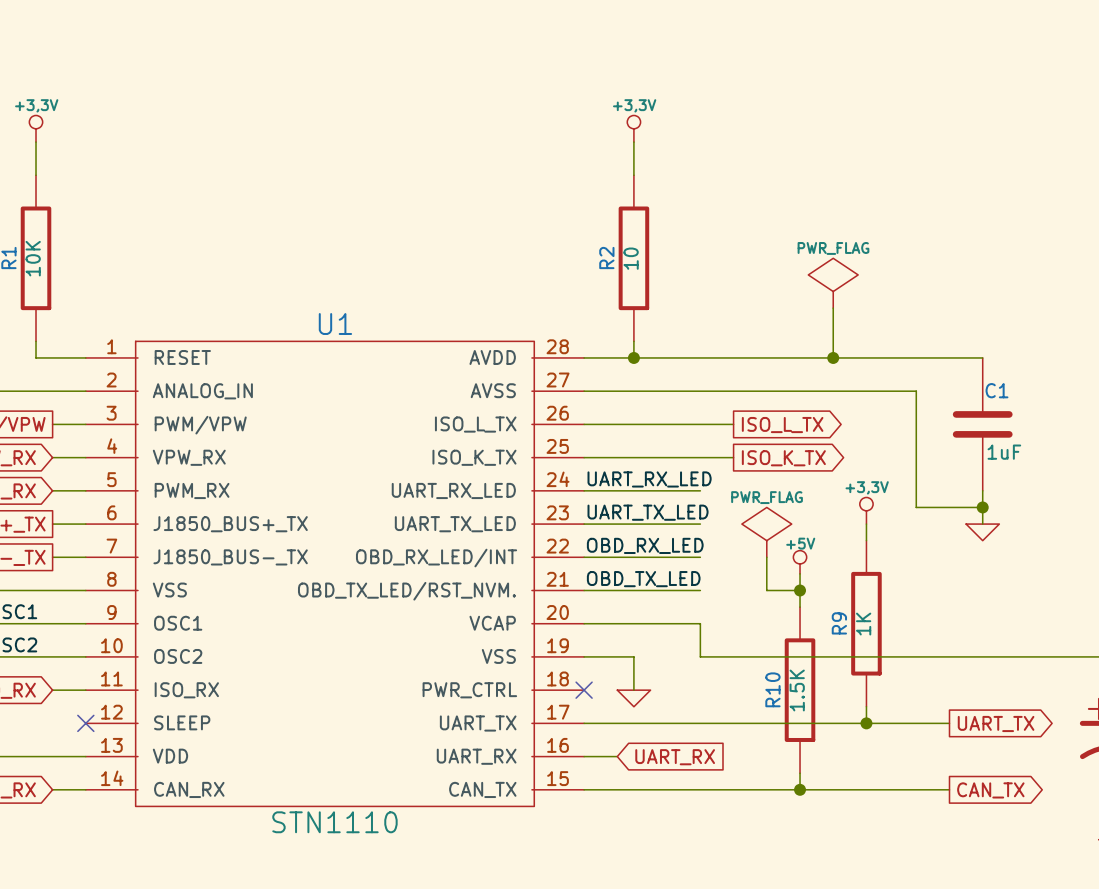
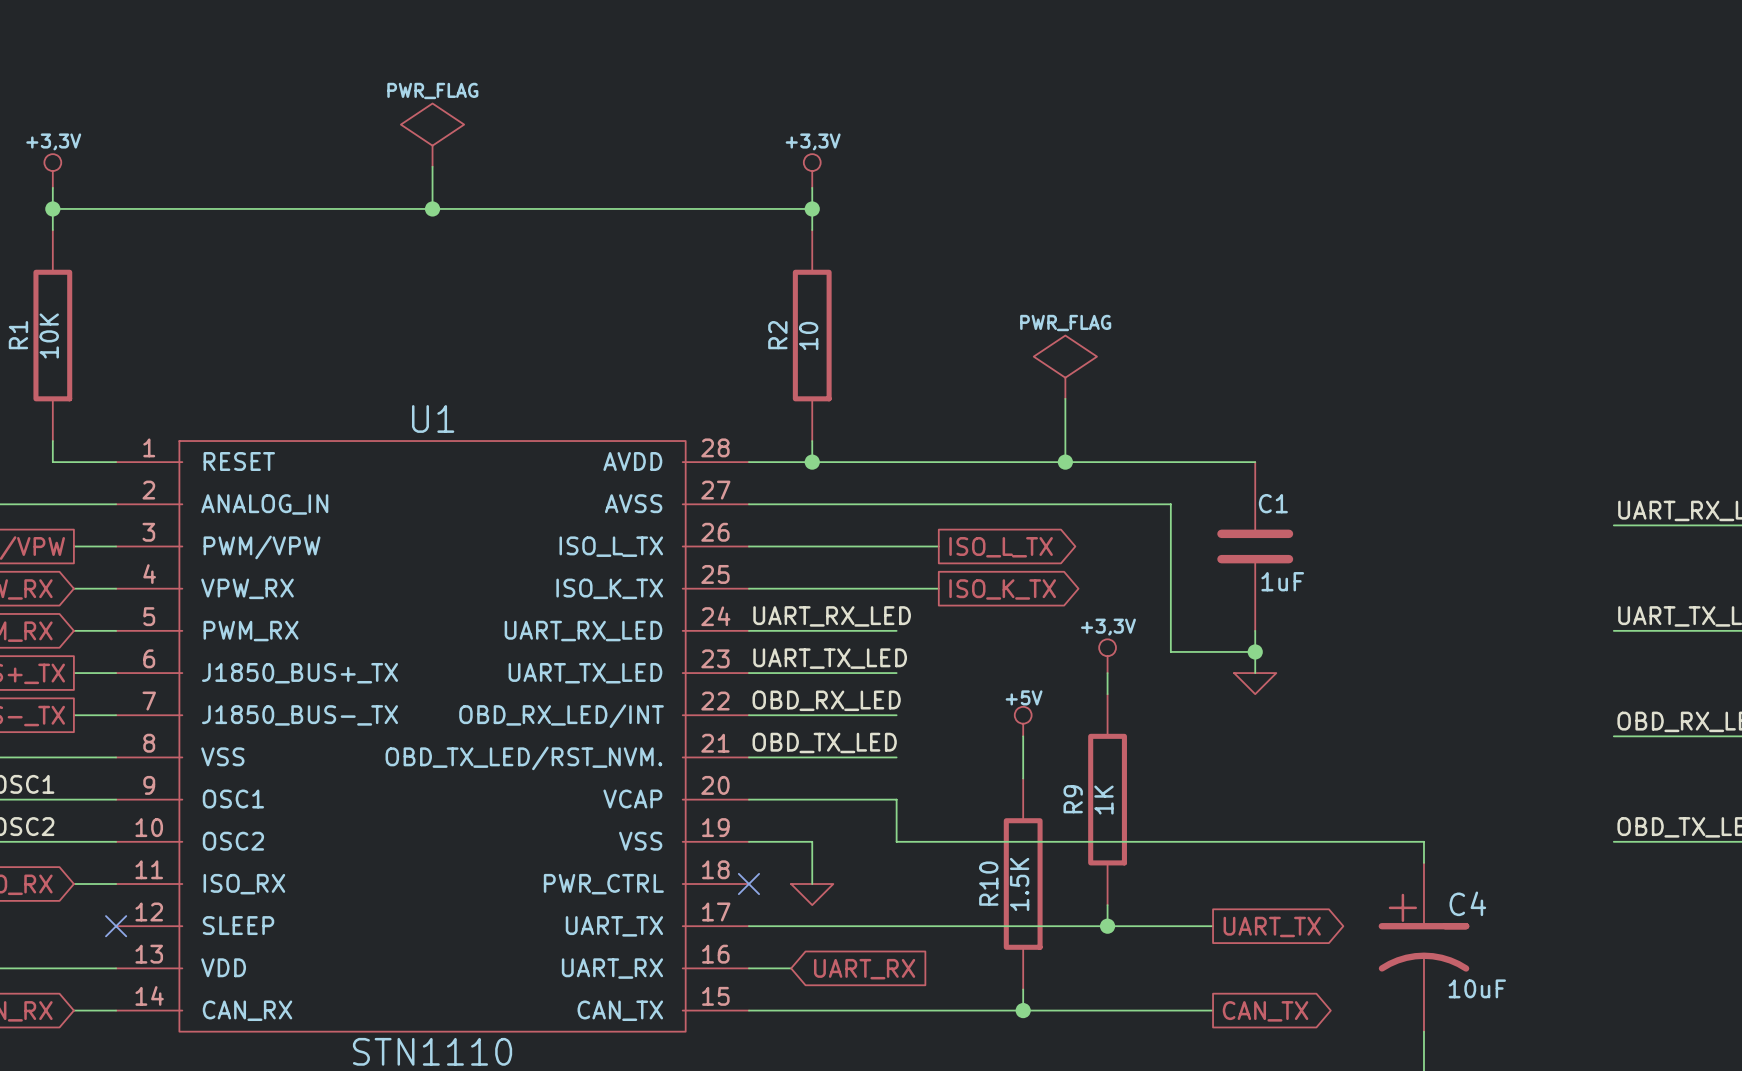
power symbol: none -> PWR_FLAG (432, 135)
wire: none -> (432, 166) (432, 208)
wire: none -> (52, 208) (812, 208)
junction: none -> (52, 208)
junction: none -> (432, 208)
junction: none -> (812, 208)
power symbol: PWR_FLAG (766, 532) -> none
wire: (766, 557) (766, 590) (800, 590) -> none
junction: (800, 590) -> none

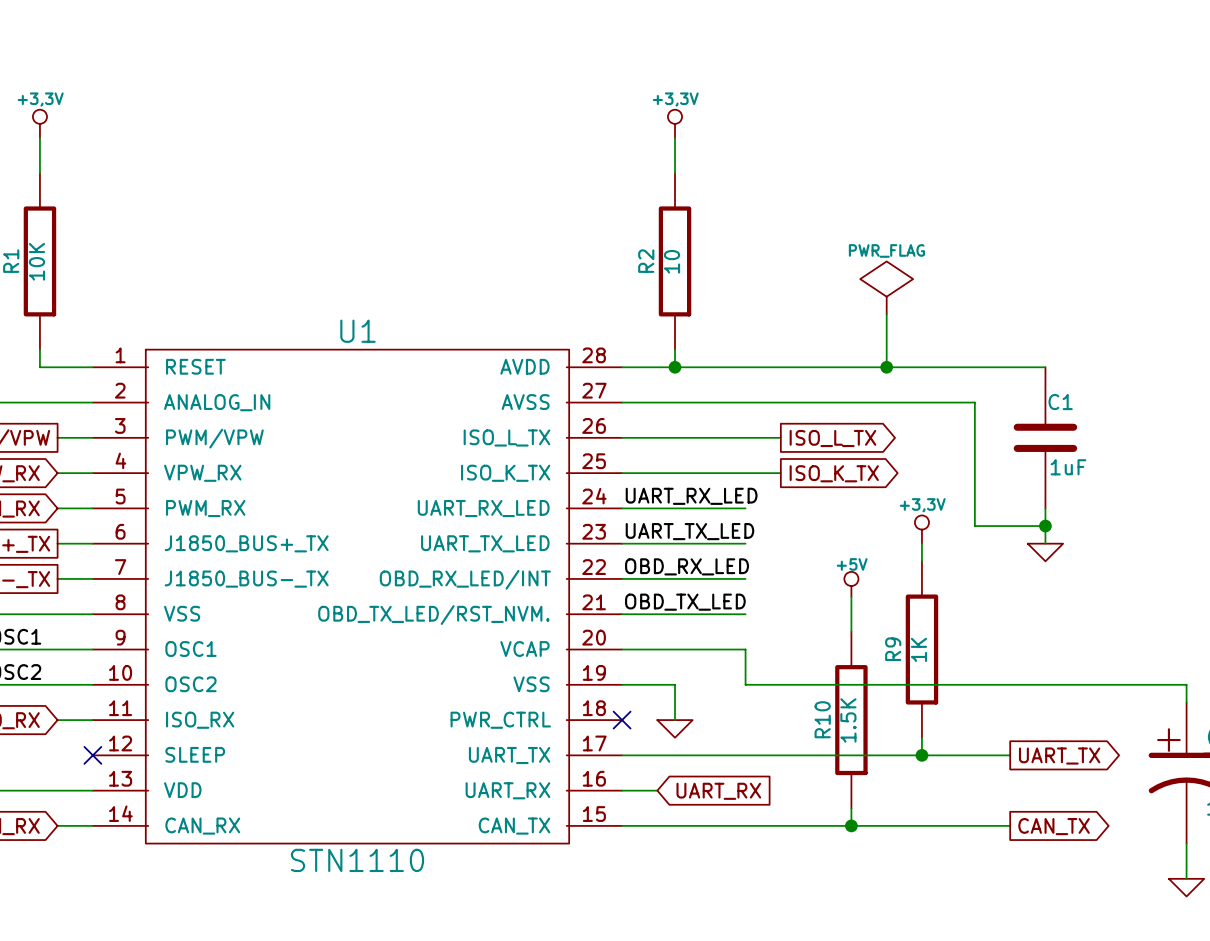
power symbol: PWR_FLAG (432, 135) -> none
wire: (432, 166) (432, 208) -> none
wire: (52, 208) (812, 208) -> none
junction: (52, 208) -> none
junction: (432, 208) -> none
junction: (812, 208) -> none

